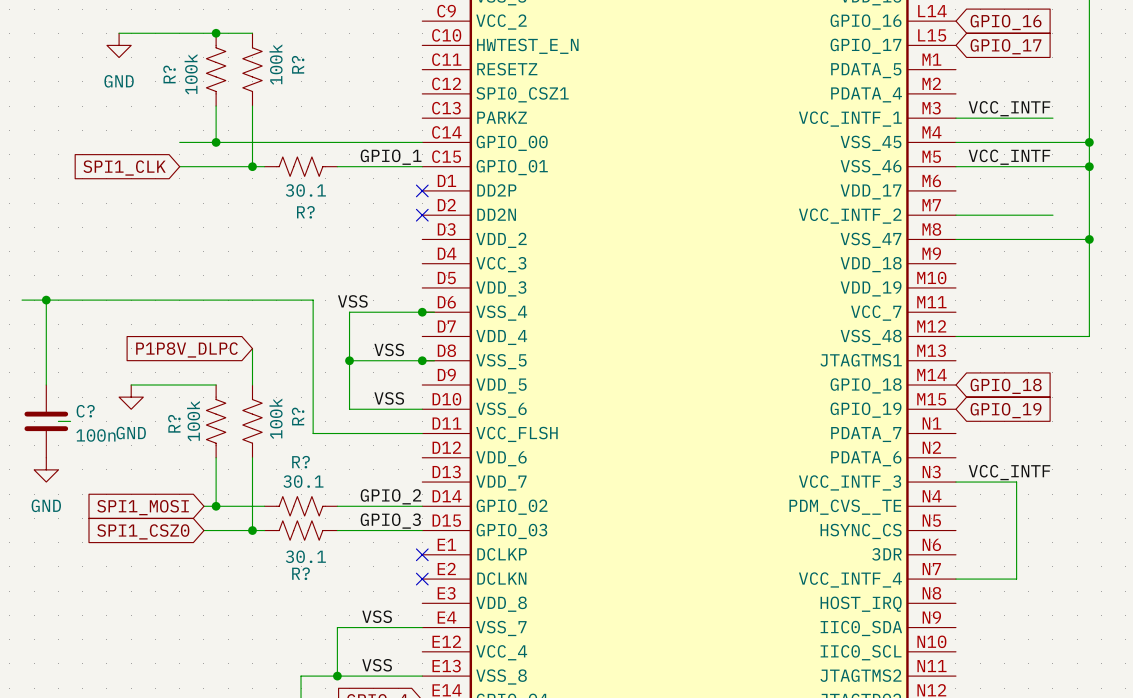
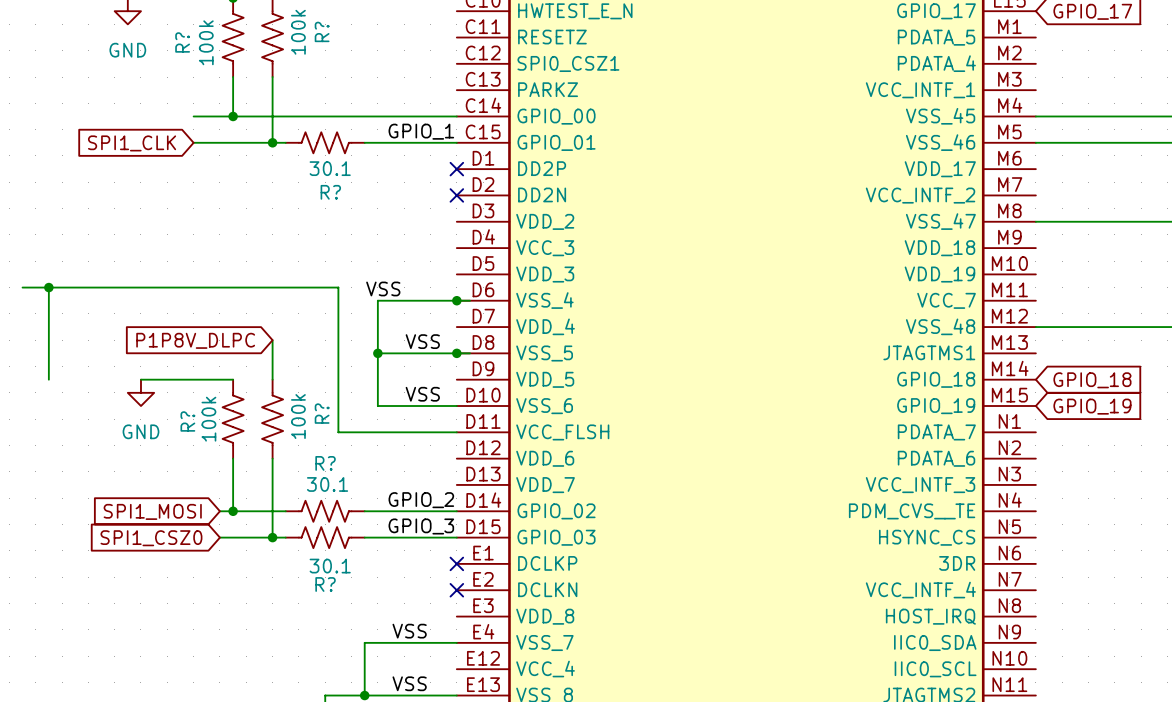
label: VCC_INTF (1009, 108) -> none
wire: (955, 118) (1052, 118) -> none
label: VCC_INTF (1009, 157) -> none
wire: (955, 215) (1052, 215) -> none
C?: 100n (46, 421) -> none
wire: (58, 421) (70, 421) -> none
power symbol: GND (46, 469) -> none
label: VCC_INTF (1009, 472) -> none
wire: (955, 482) (1016, 482) (1016, 579) (955, 579) -> none

